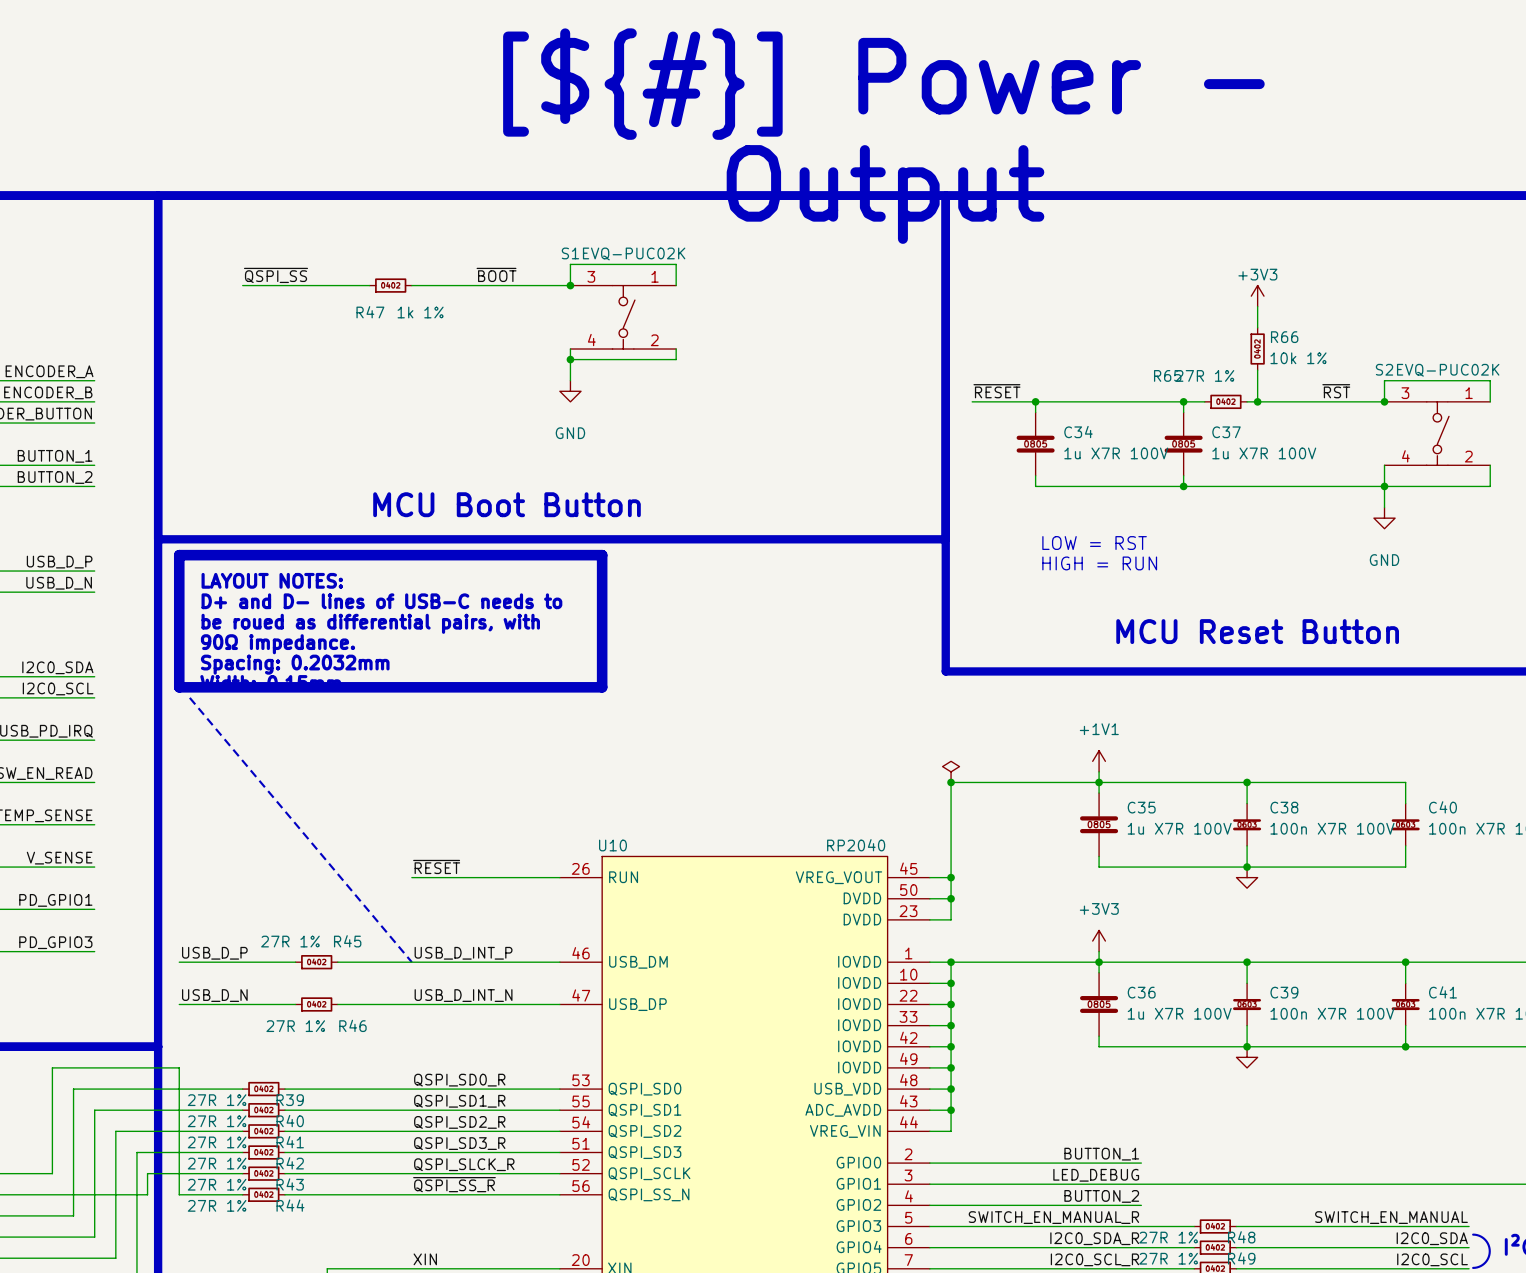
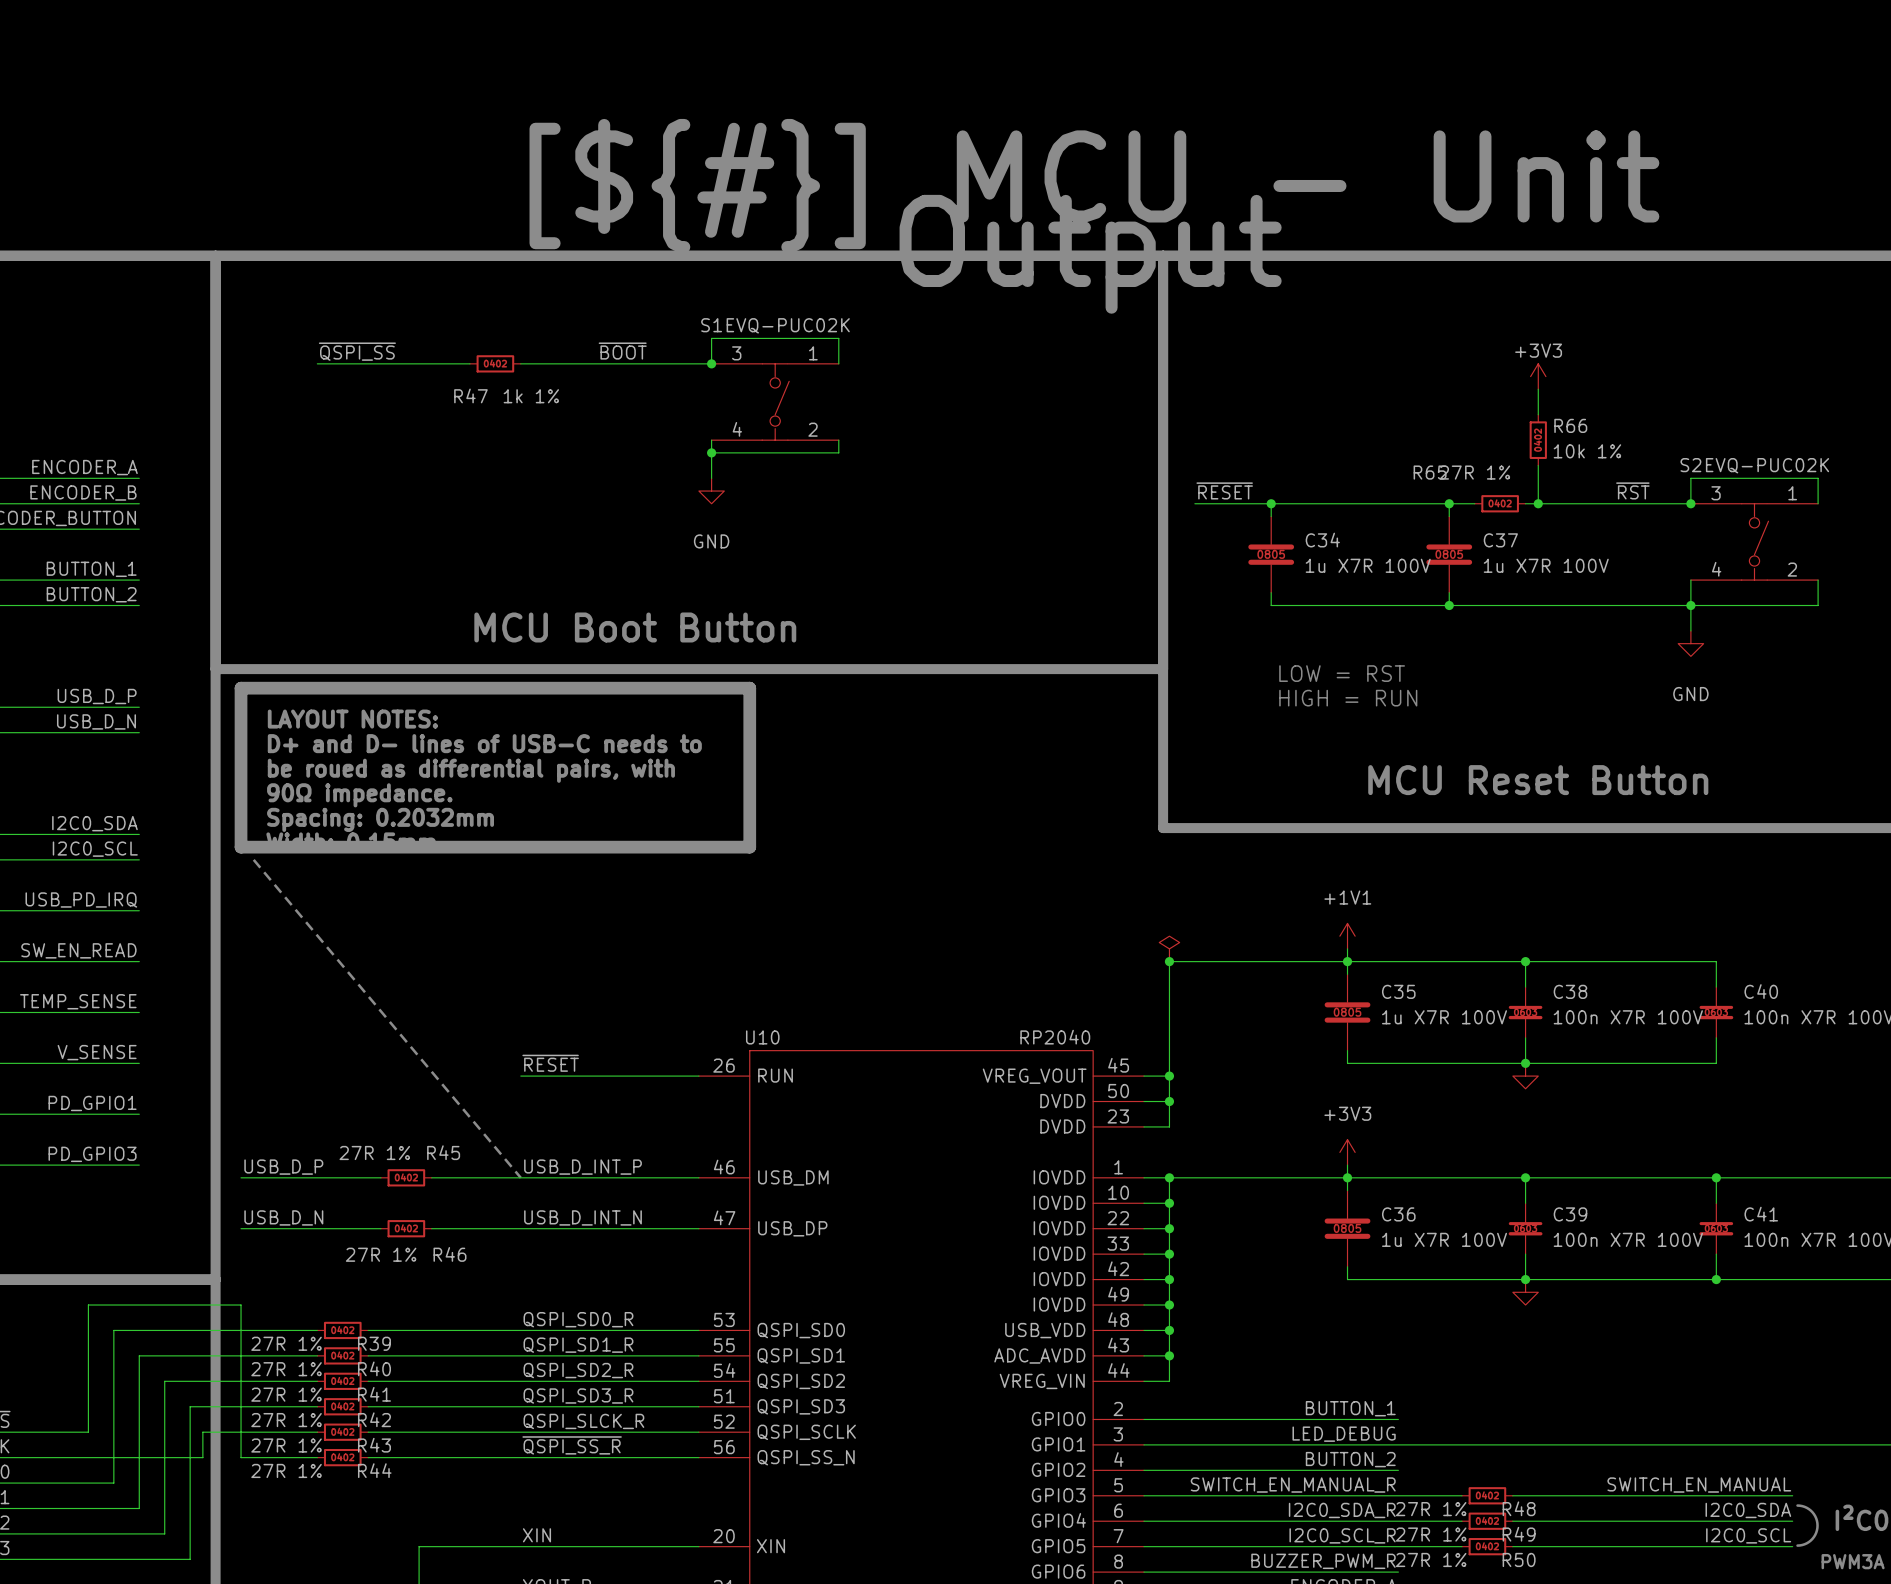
text: [${#}] Power - (883, 84) -> none
text: none -> [${#}] MCU - Unit (1094, 185)

